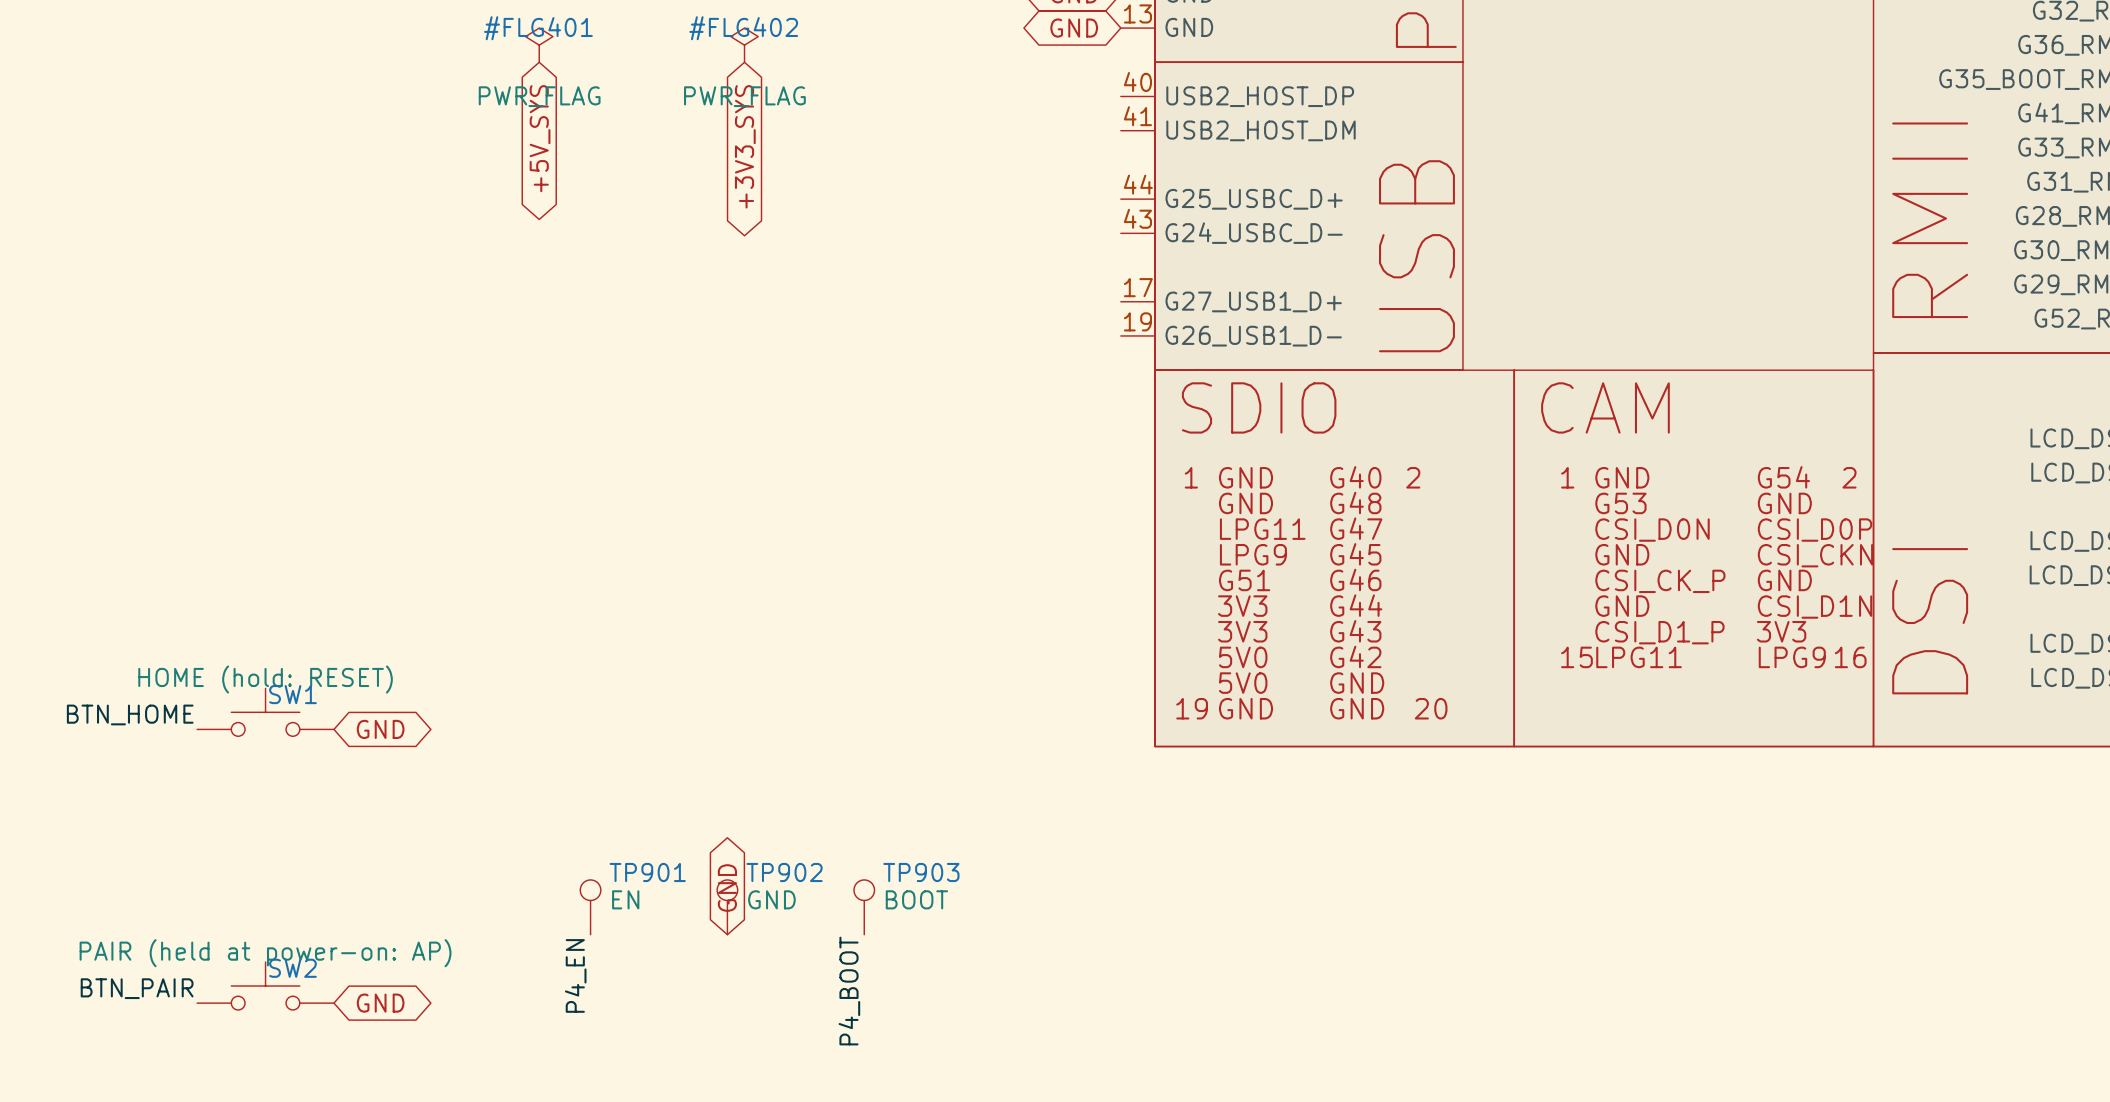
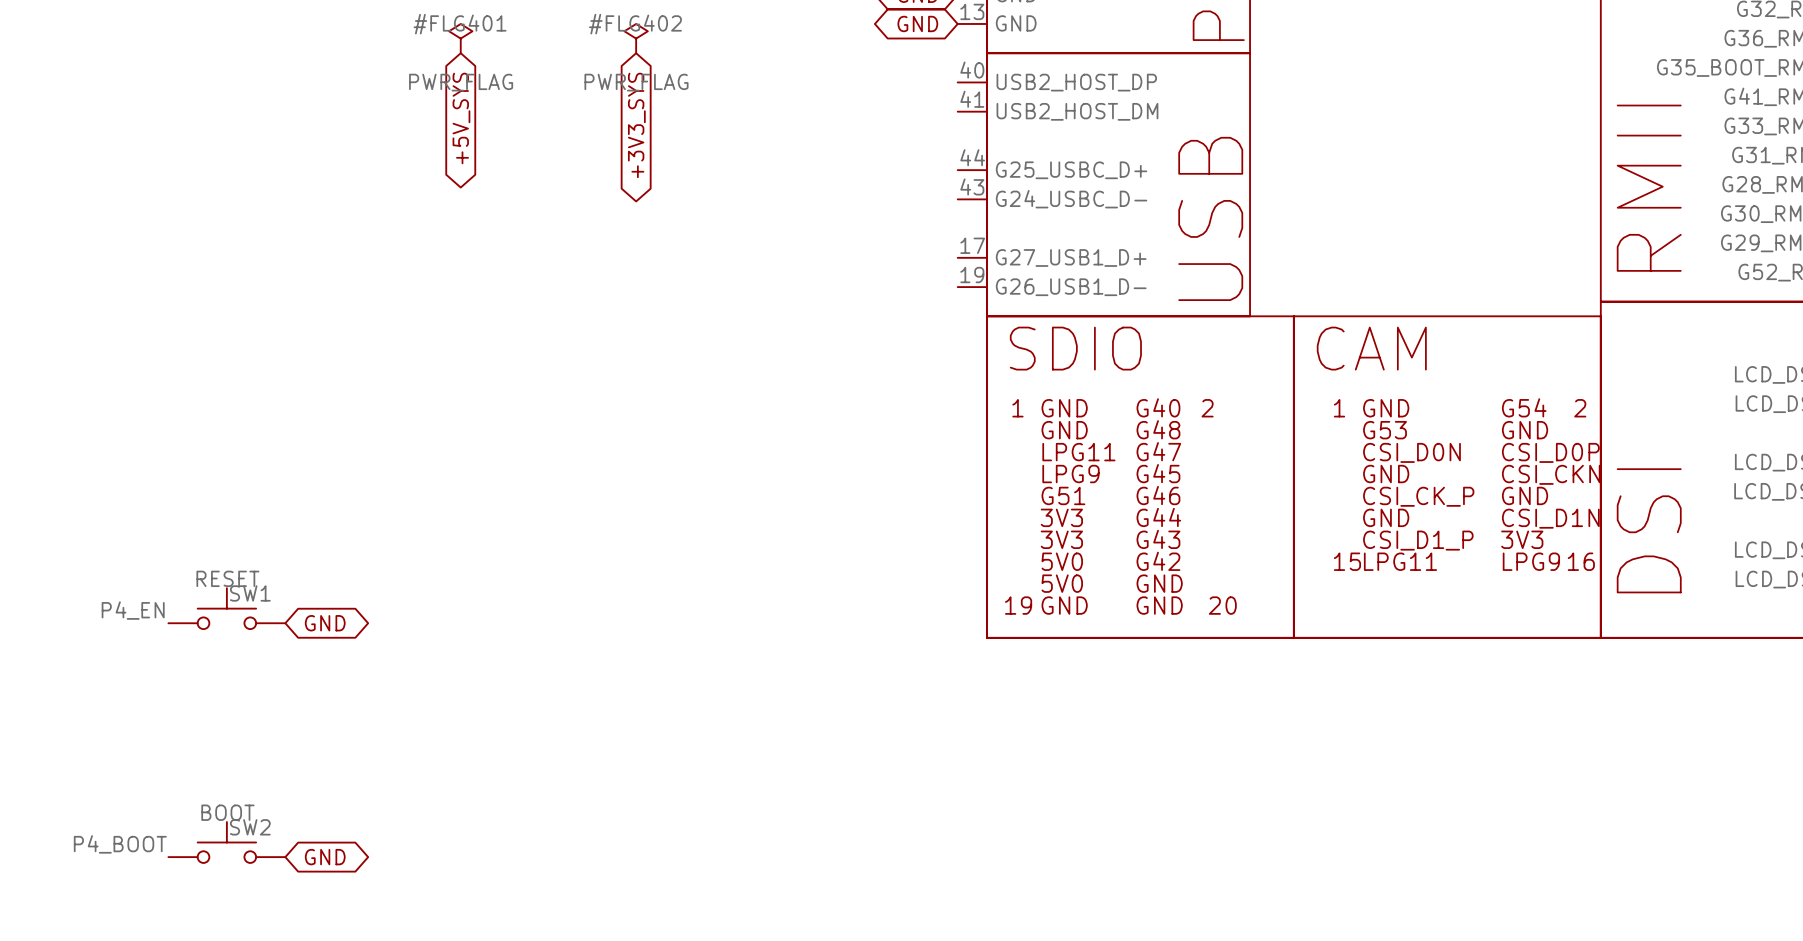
SW1 value: HOME (hold: RESET) (265, 679) -> RESET (227, 578)
label: BTN_HOME (130, 714) -> P4_EN (133, 610)
global label: GND (727, 888) -> none
TP901: EN (590, 907) -> none
TP902: GND (727, 907) -> none
TP903: BOOT (864, 907) -> none
SW2 value: PAIR (held at power-on: AP) (265, 953) -> BOOT (227, 812)
label: P4_EN (575, 975) -> none
label: BTN_PAIR (137, 988) -> P4_BOOT (120, 844)
label: P4_BOOT (849, 991) -> none

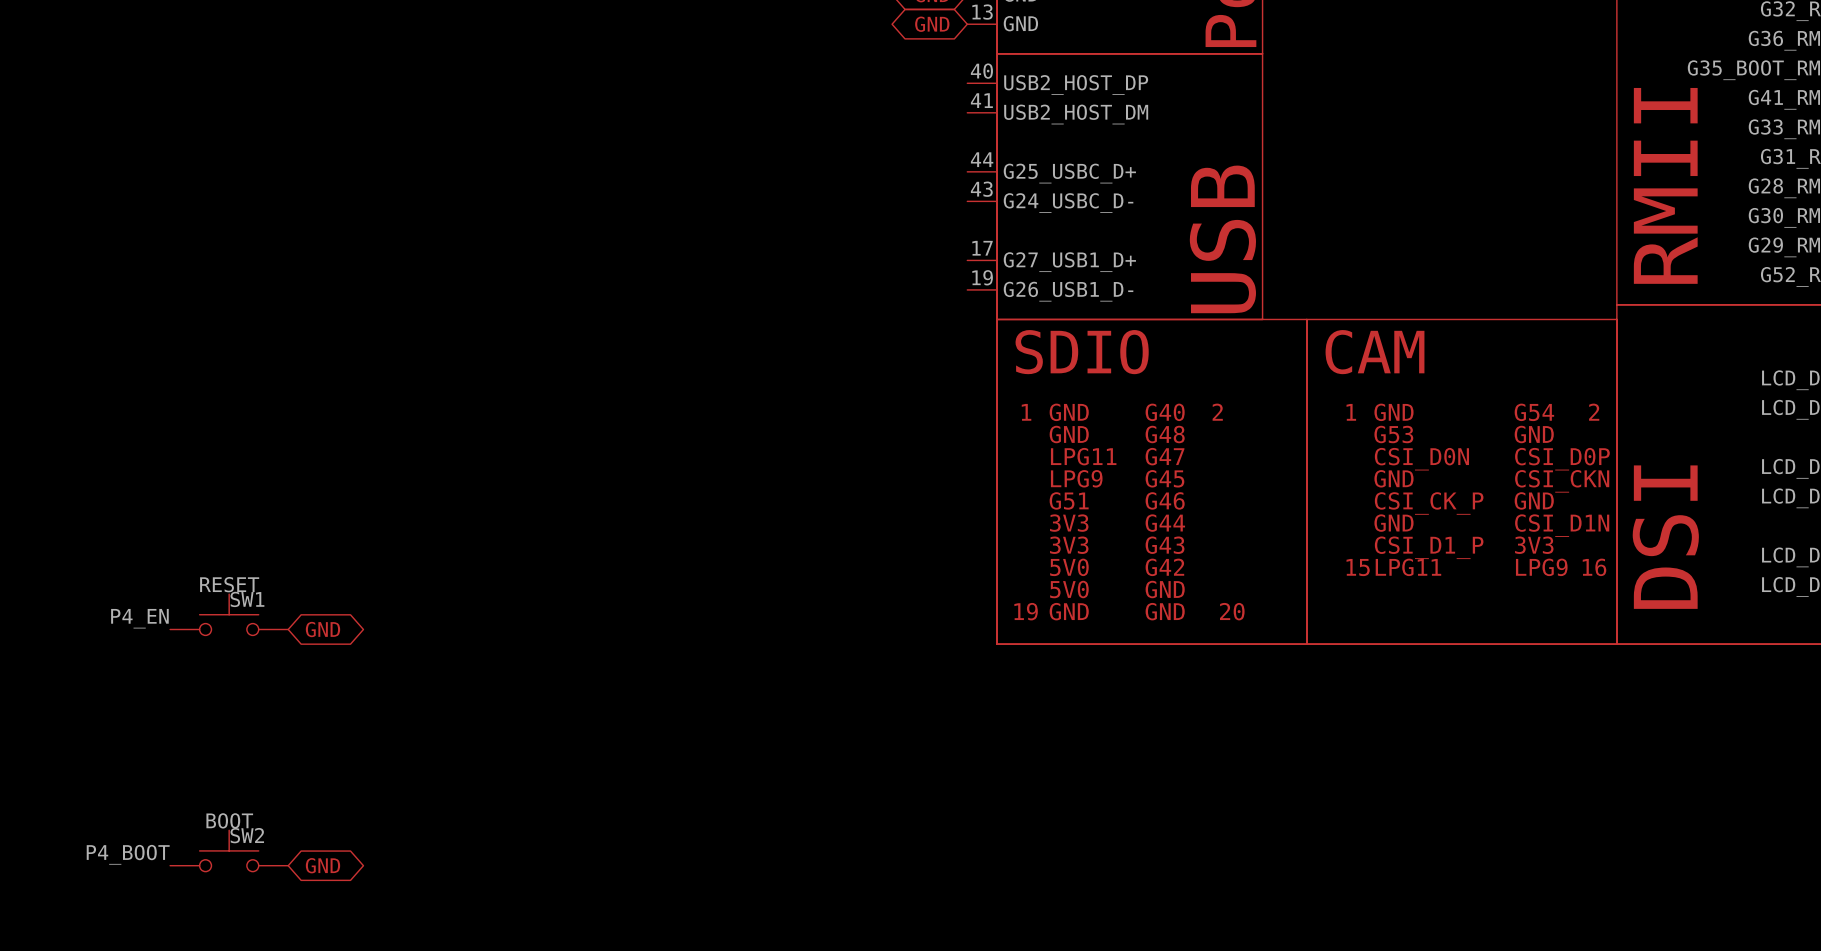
#FLG401: PWR_FLAG (460, 38) -> none
#FLG402: PWR_FLAG (636, 38) -> none
global label: +5V_SYS (461, 118) -> none
global label: +3V3_SYS (636, 125) -> none

